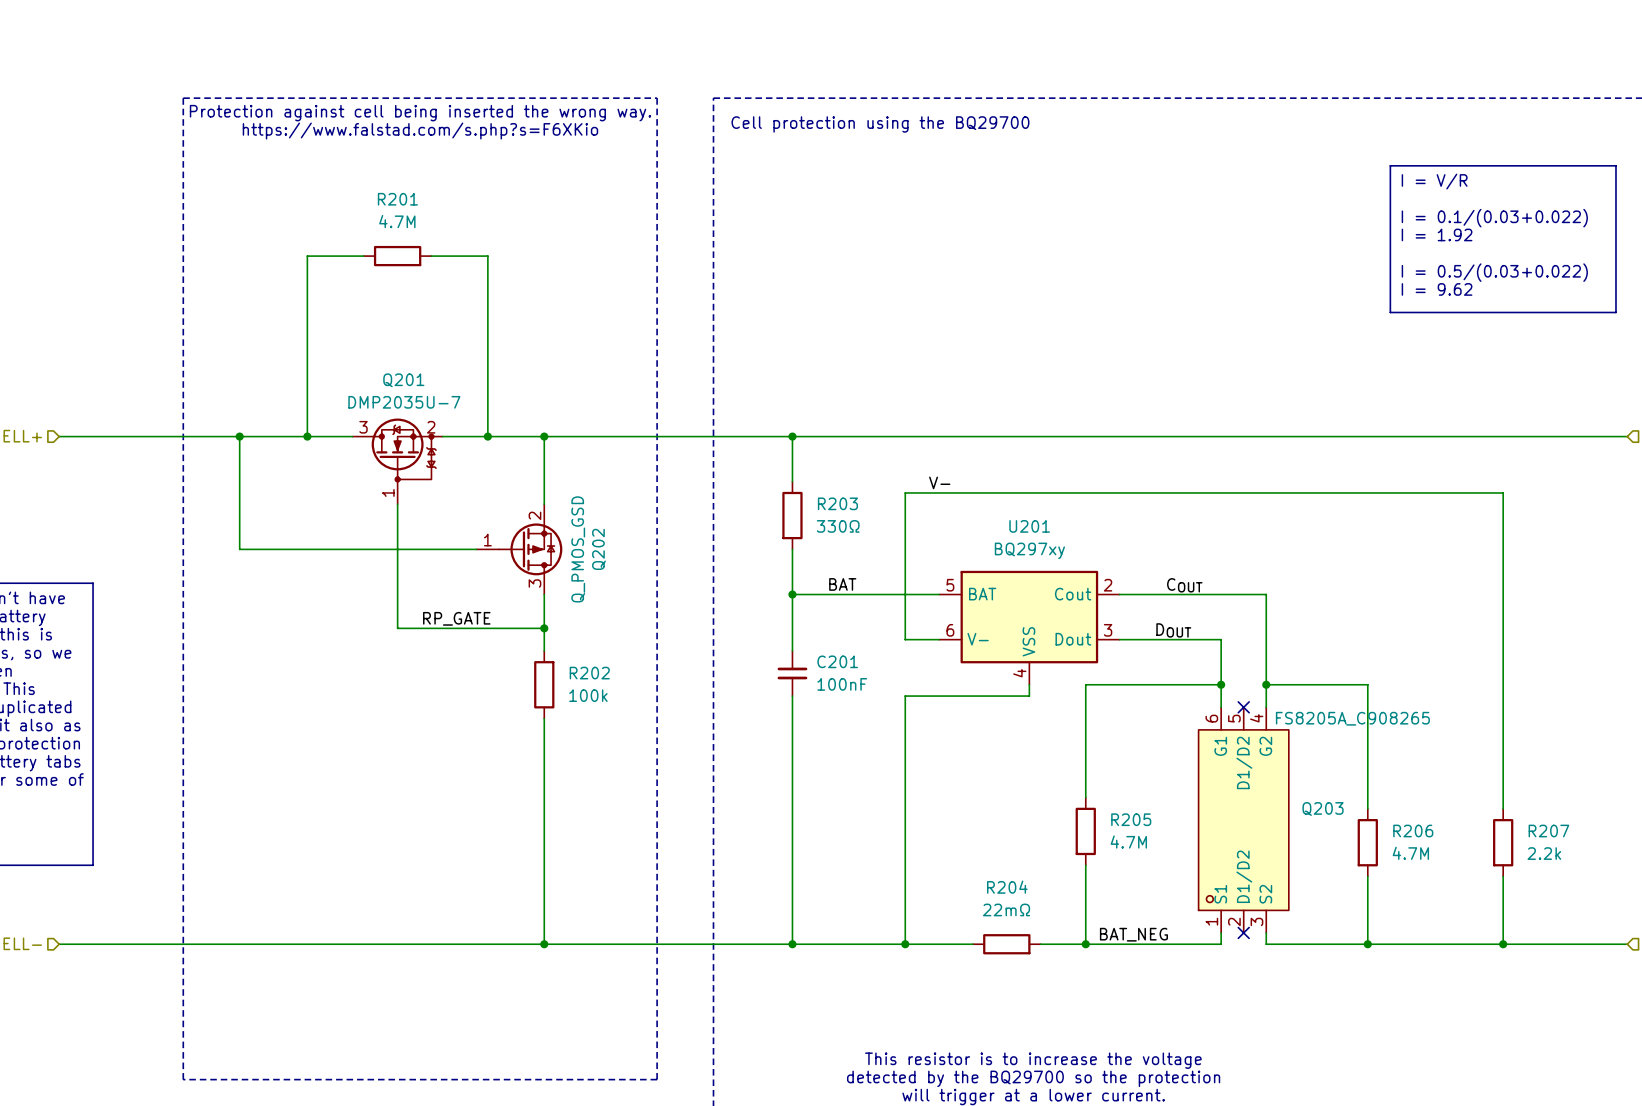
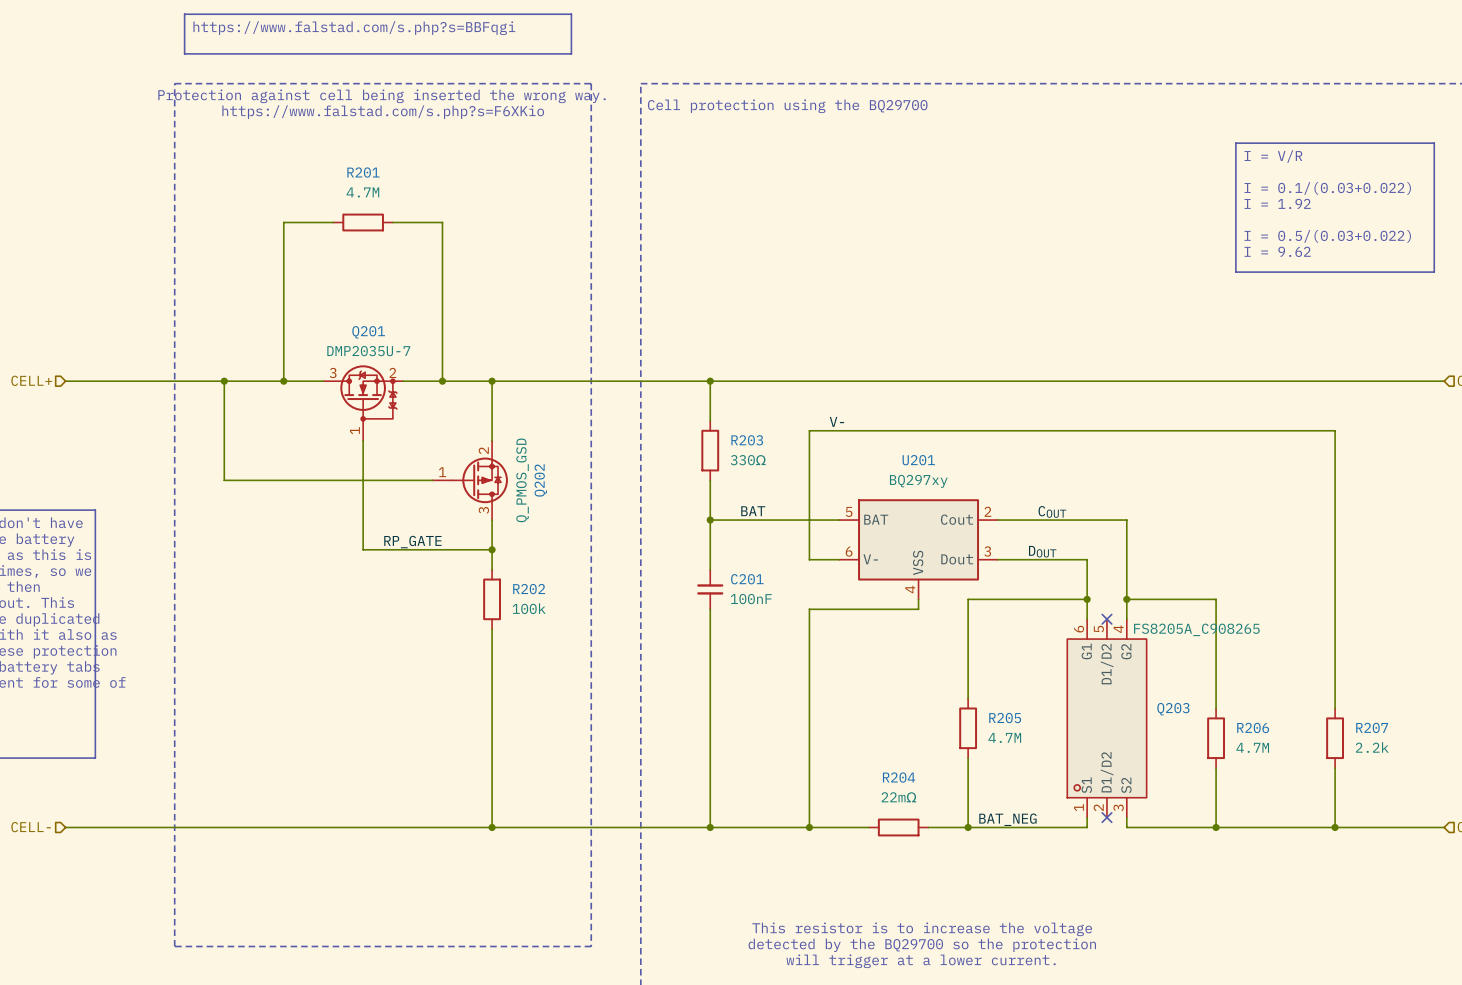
line: none -> (184, 14) (571, 14) (571, 53) (184, 53) (184, 14)
text: none -> https://www.falstad.com/s.php?s=BBFqgi (354, 28)

